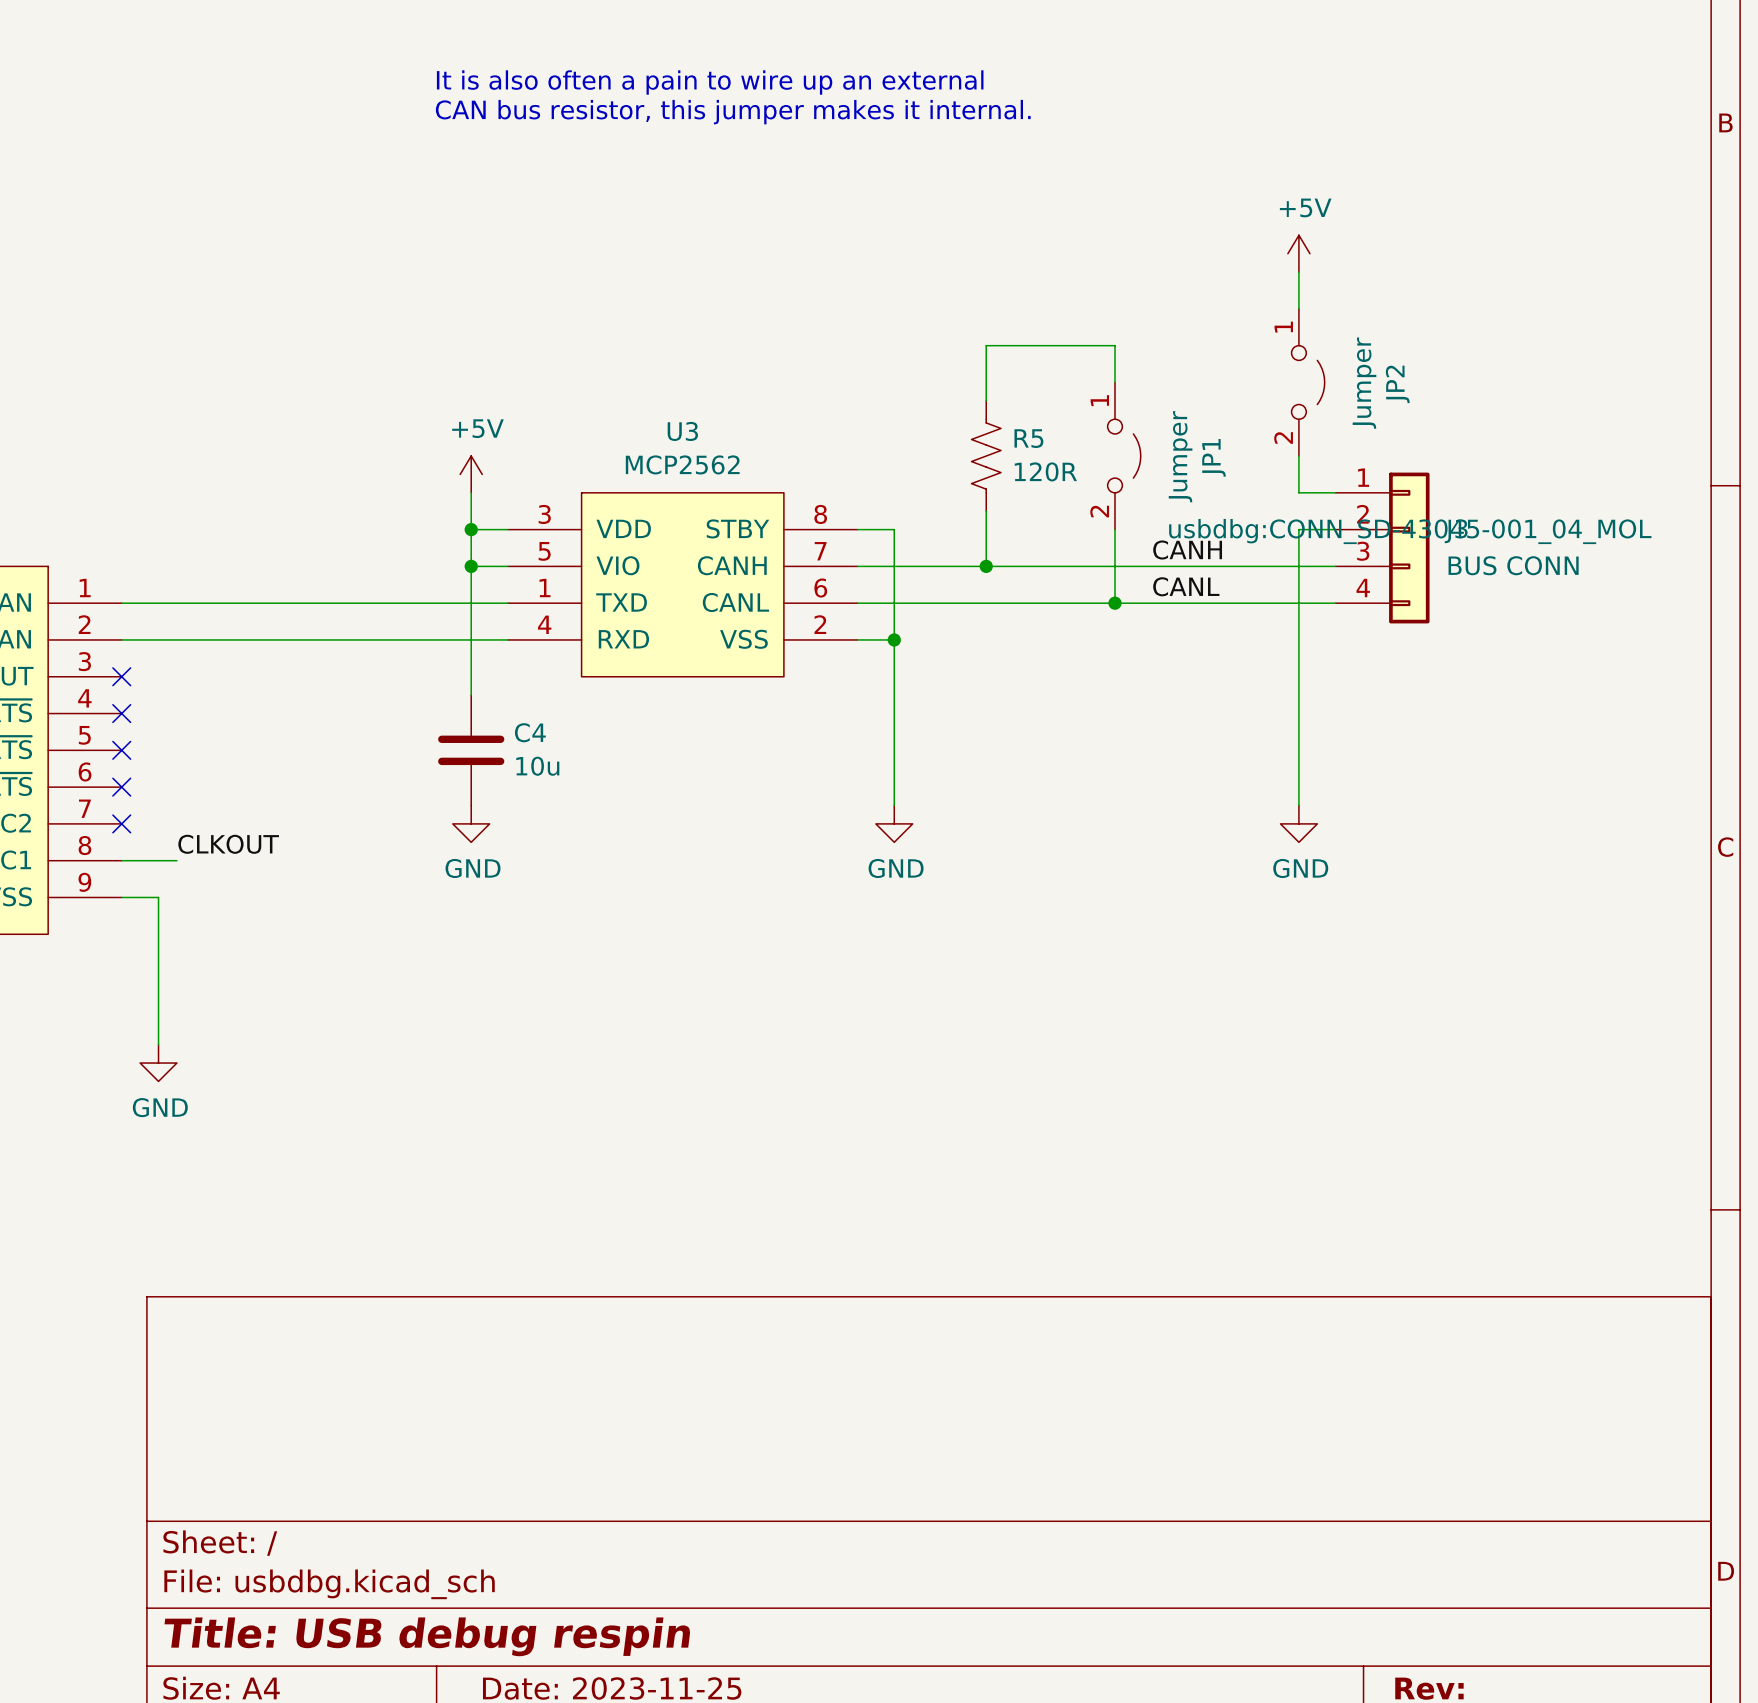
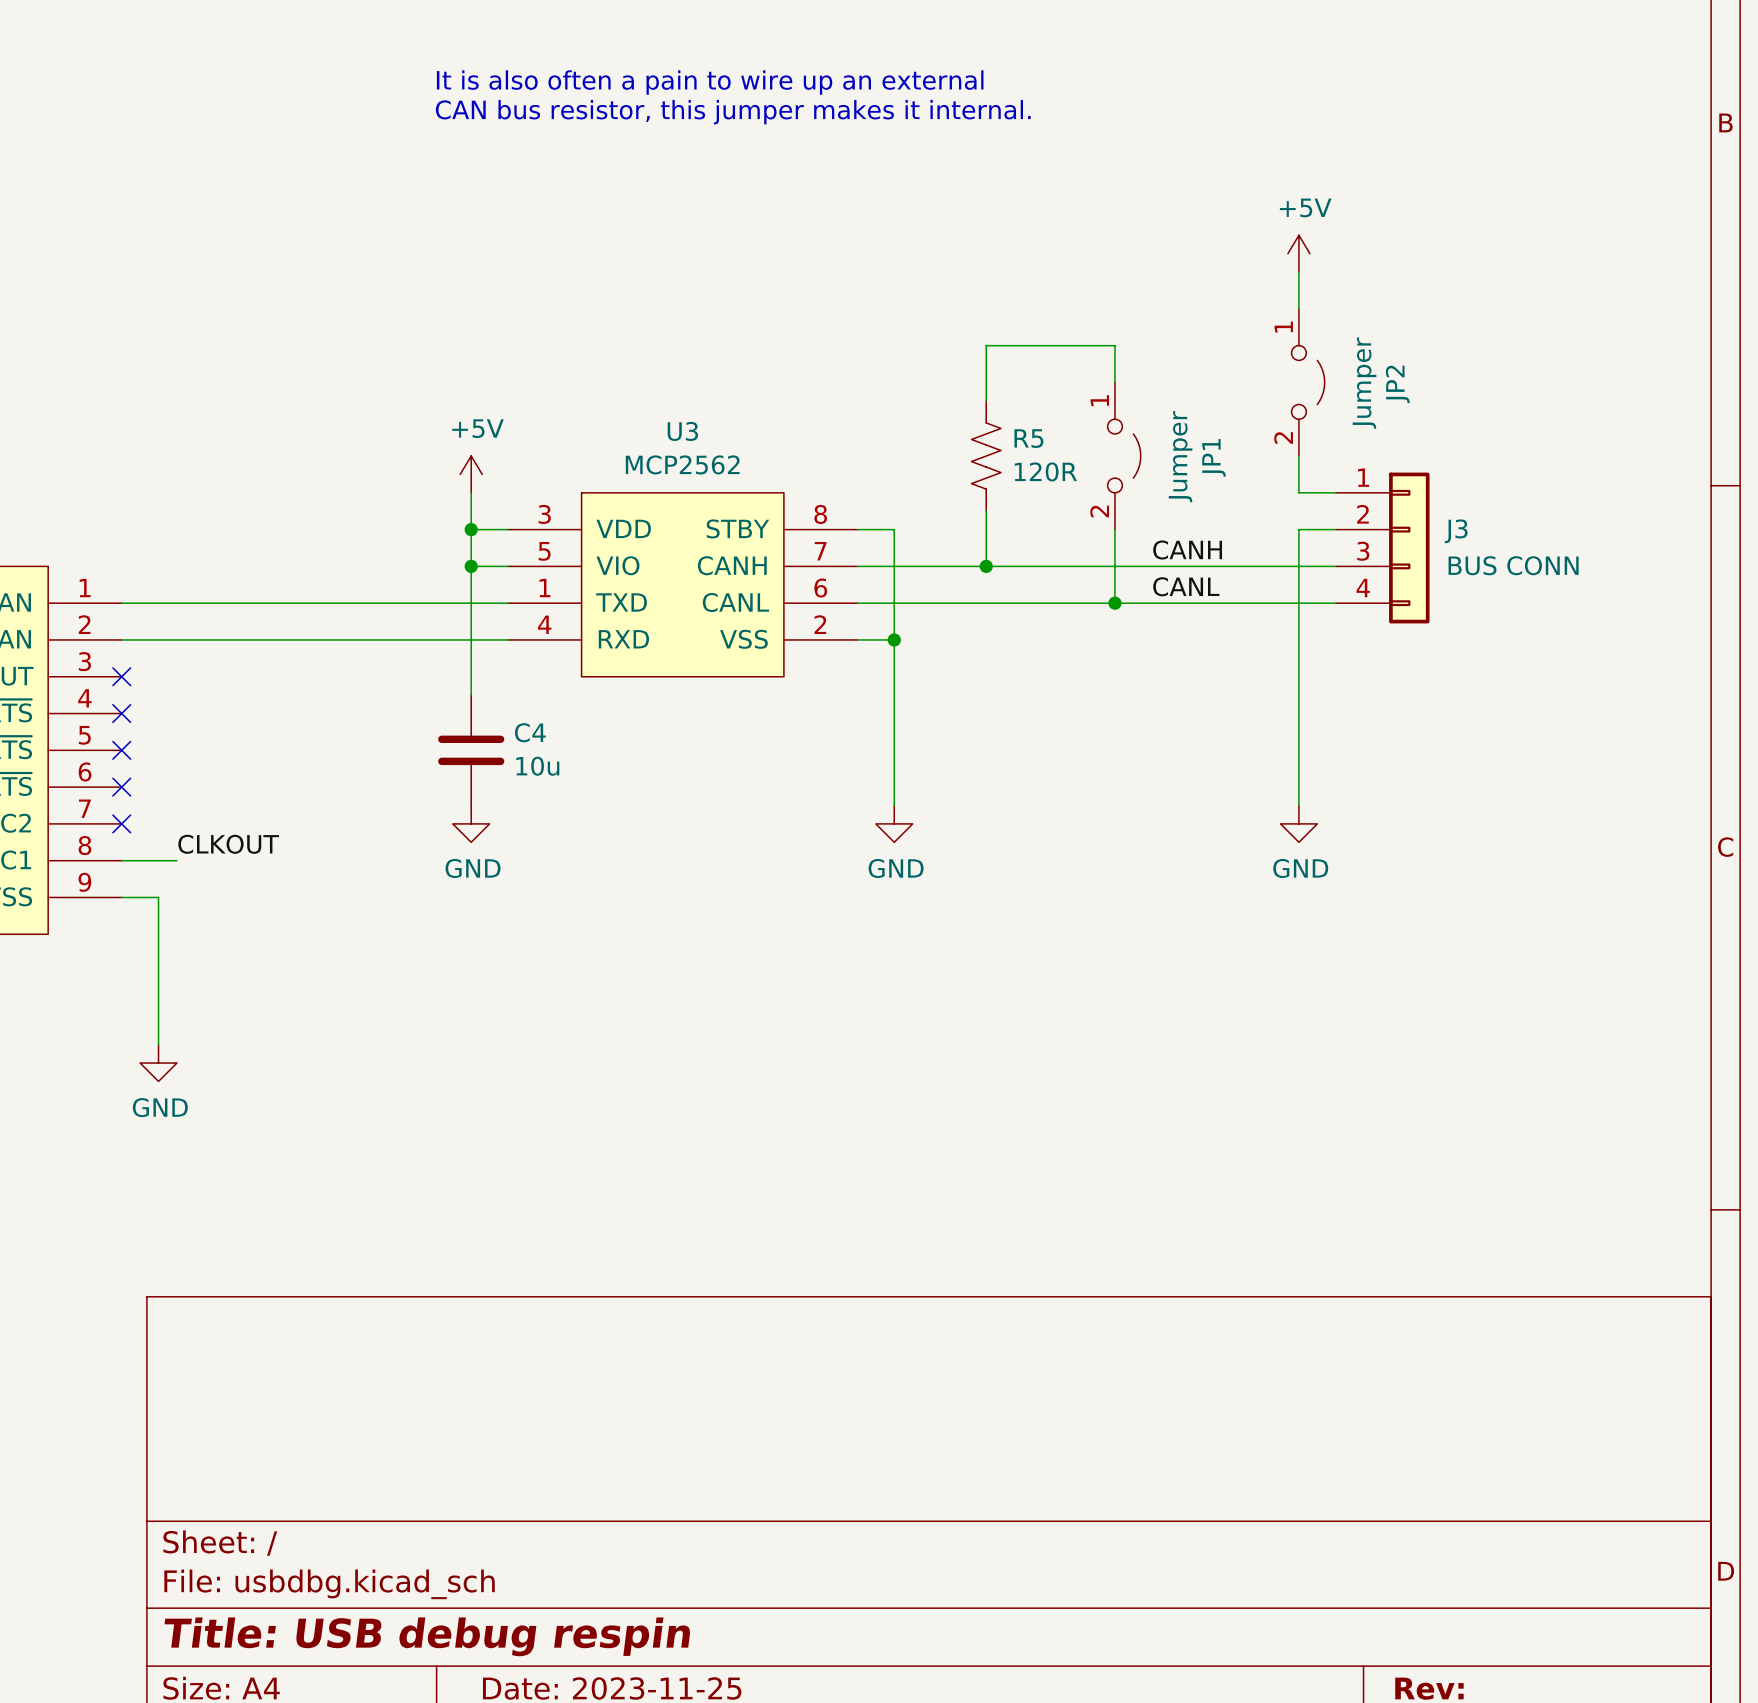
J3 text: usbdbg:CONN_SD-43045-001_04_MOL (1410, 531) -> none

